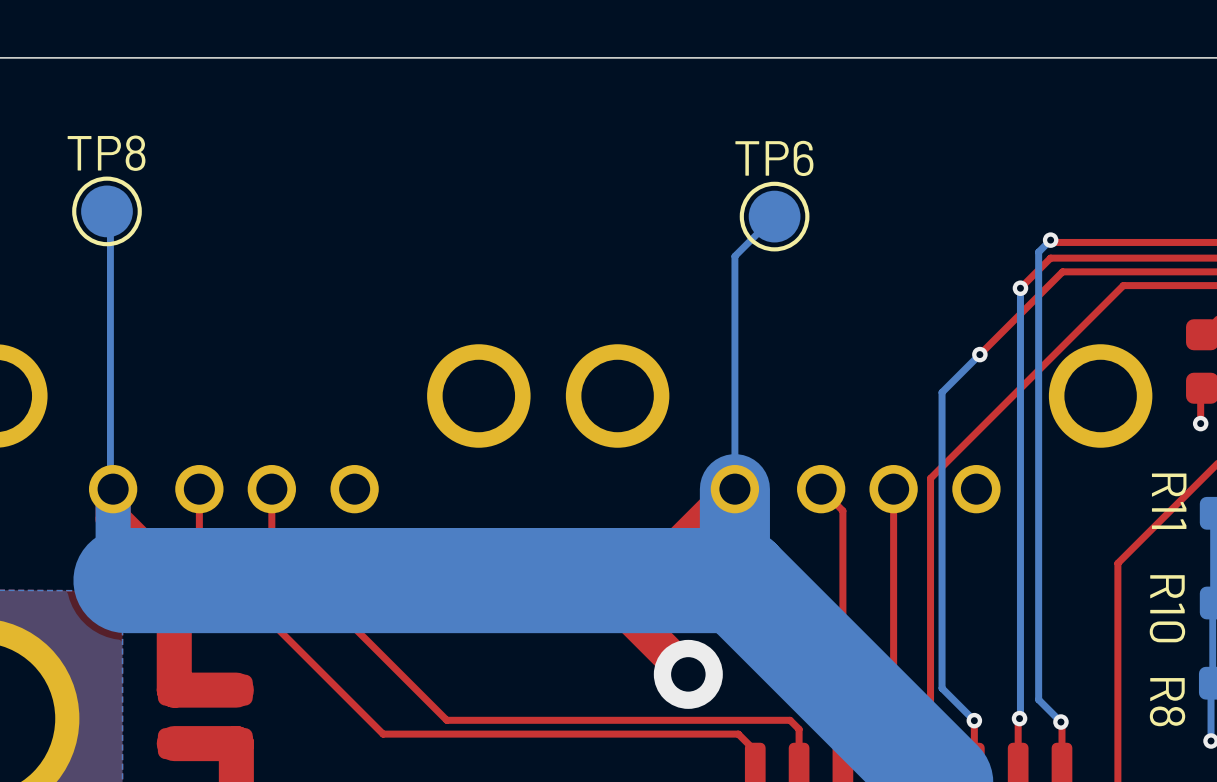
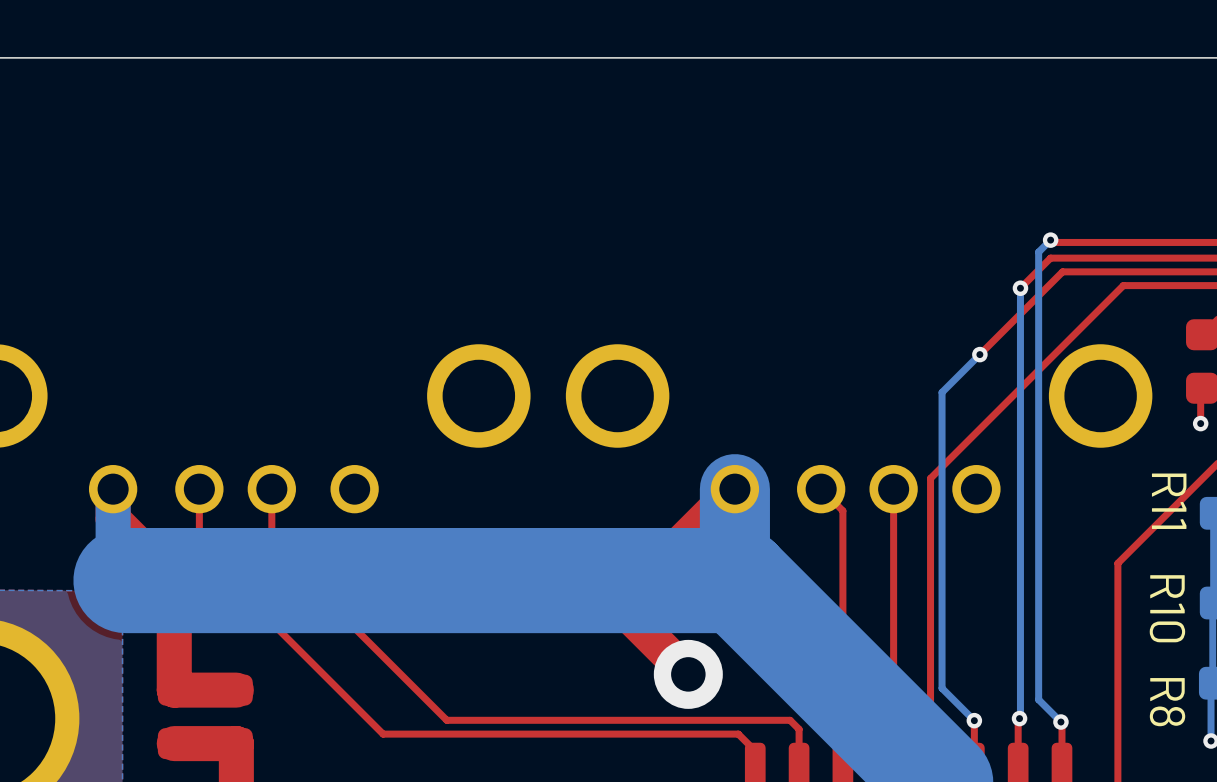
bottom track: (106, 211) (110, 214) (110, 486) (113, 489) -> none
TP8: (106, 211) -> none
bottom track: (774, 216) (734, 256) (734, 489) -> none
TP6: (774, 216) -> none

